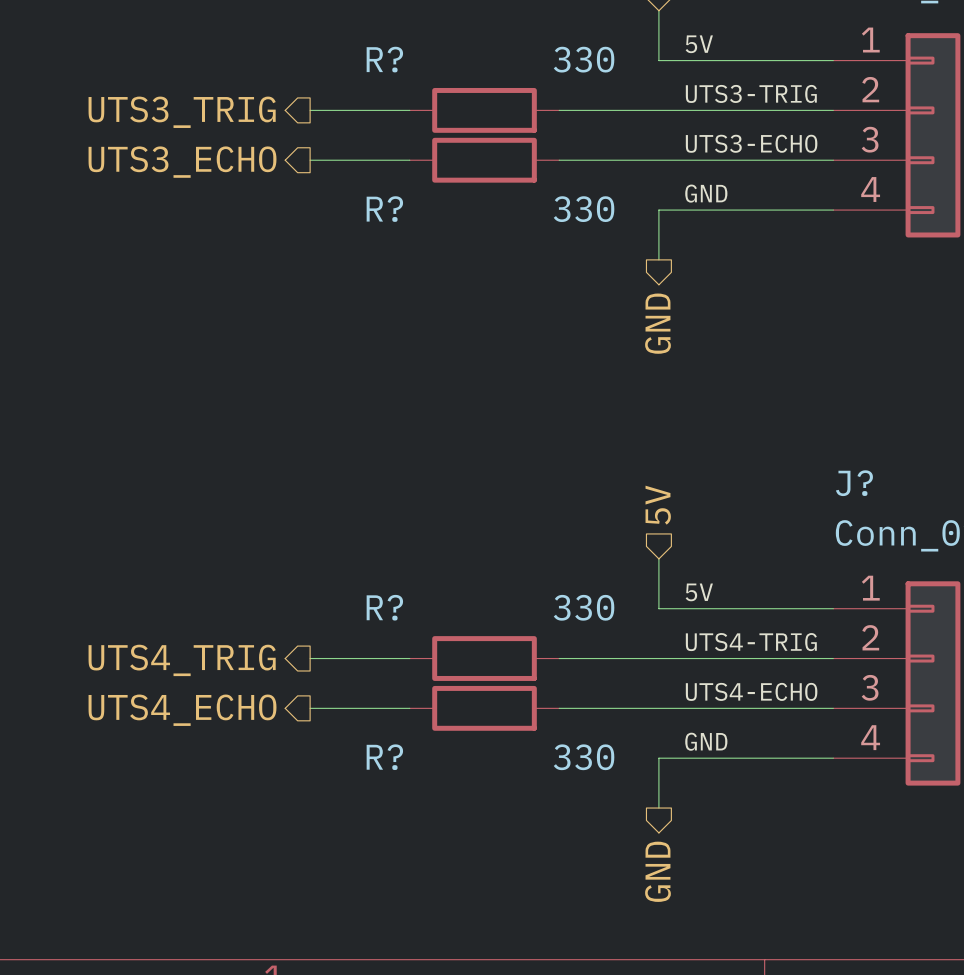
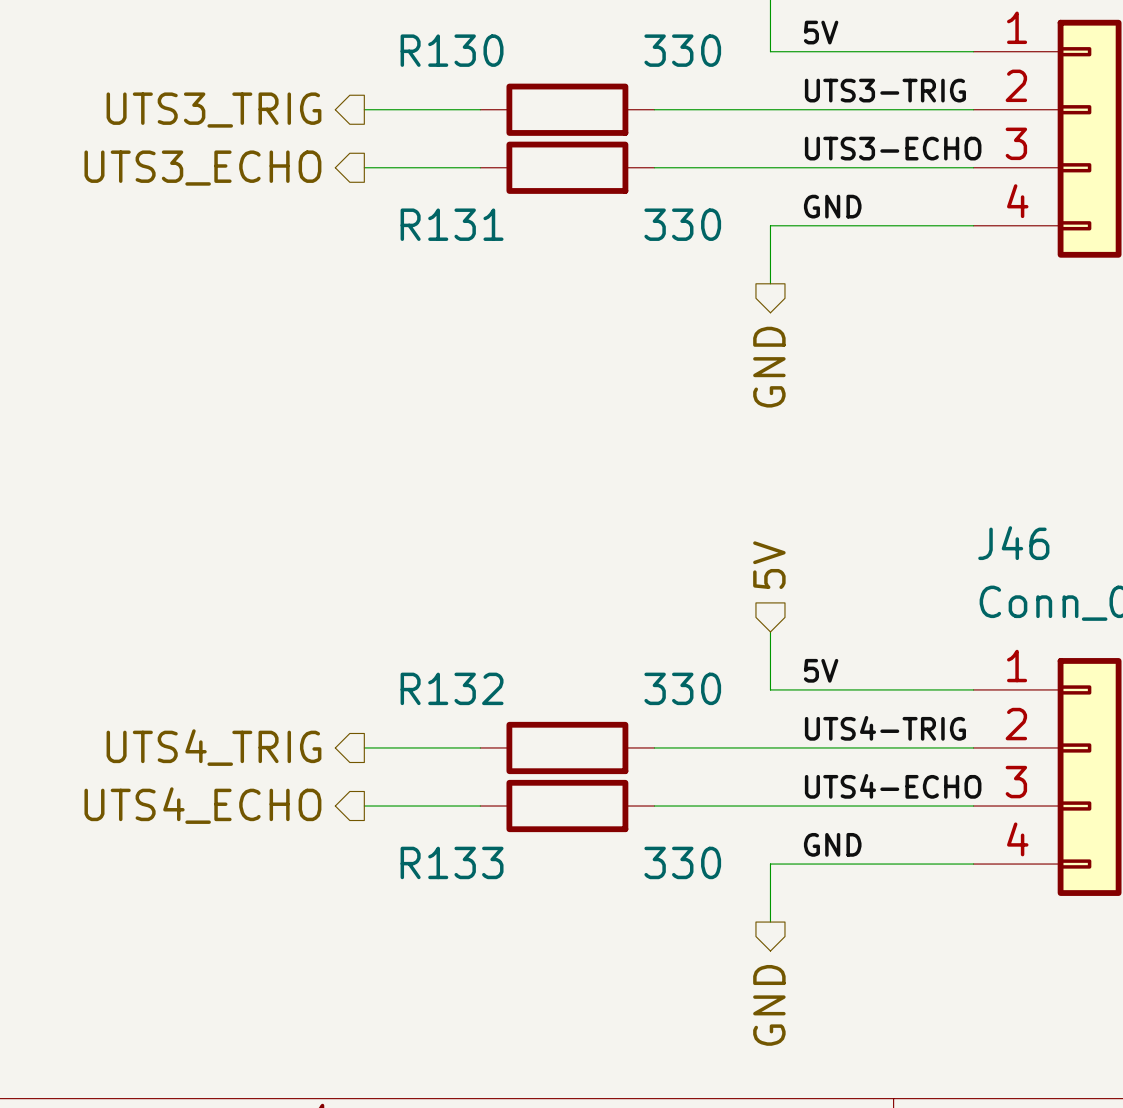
R? name: R? (384, 59) -> R130 (452, 50)
R? name: R? (384, 209) -> R131 (452, 224)
J? name: J? (854, 483) -> J46 (1013, 543)
R? name: R? (384, 607) -> R132 (452, 688)
R? name: R? (384, 757) -> R133 (452, 862)

